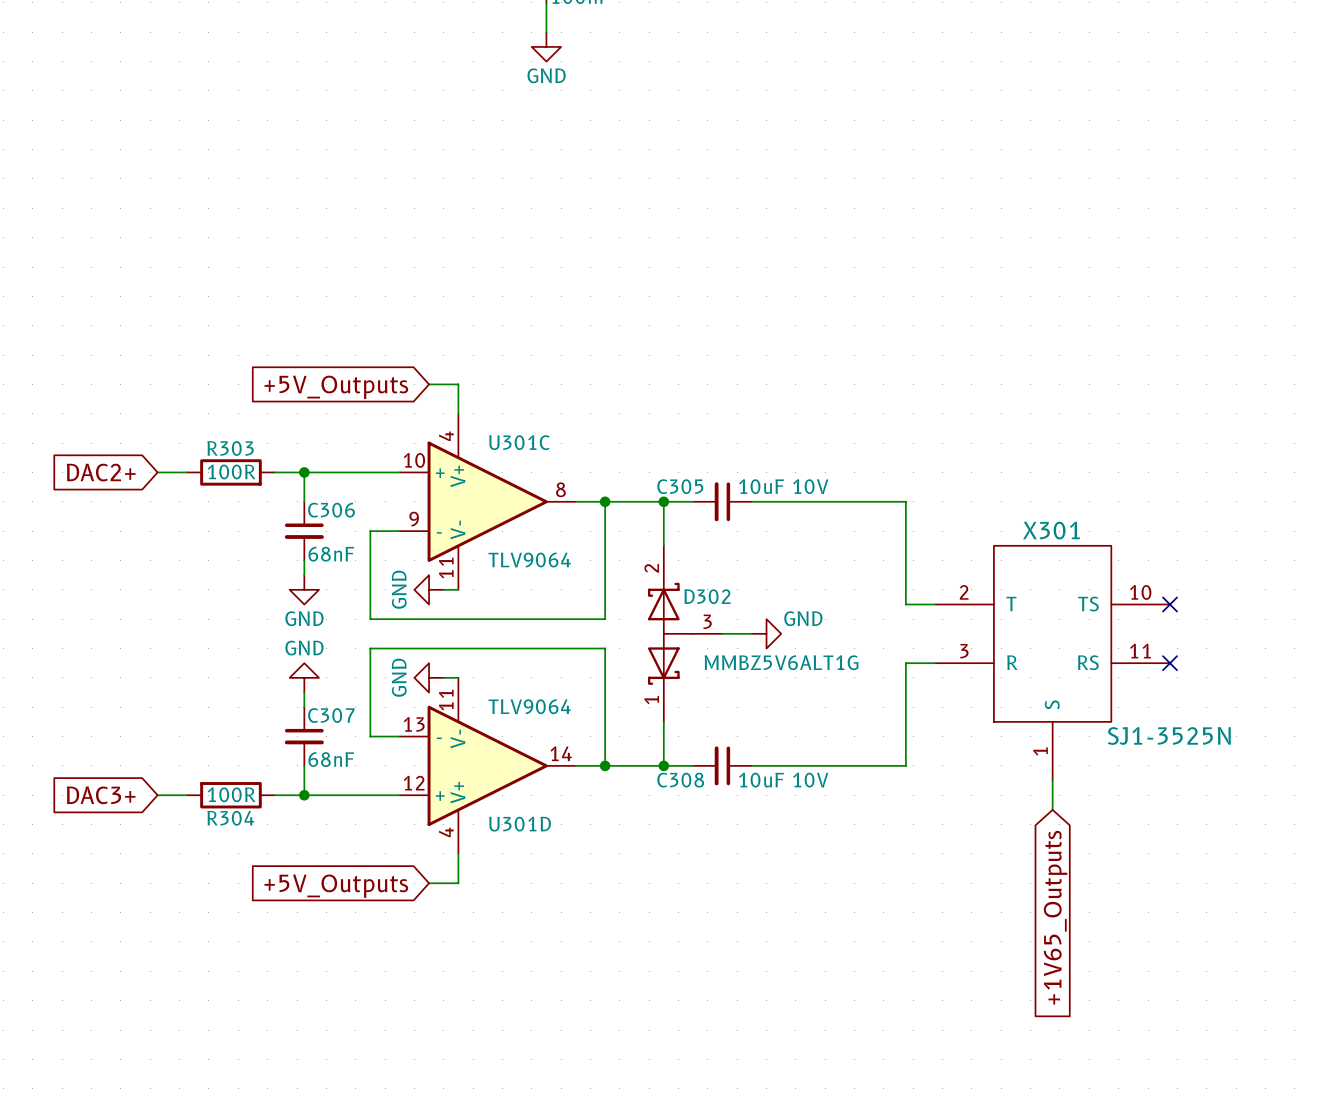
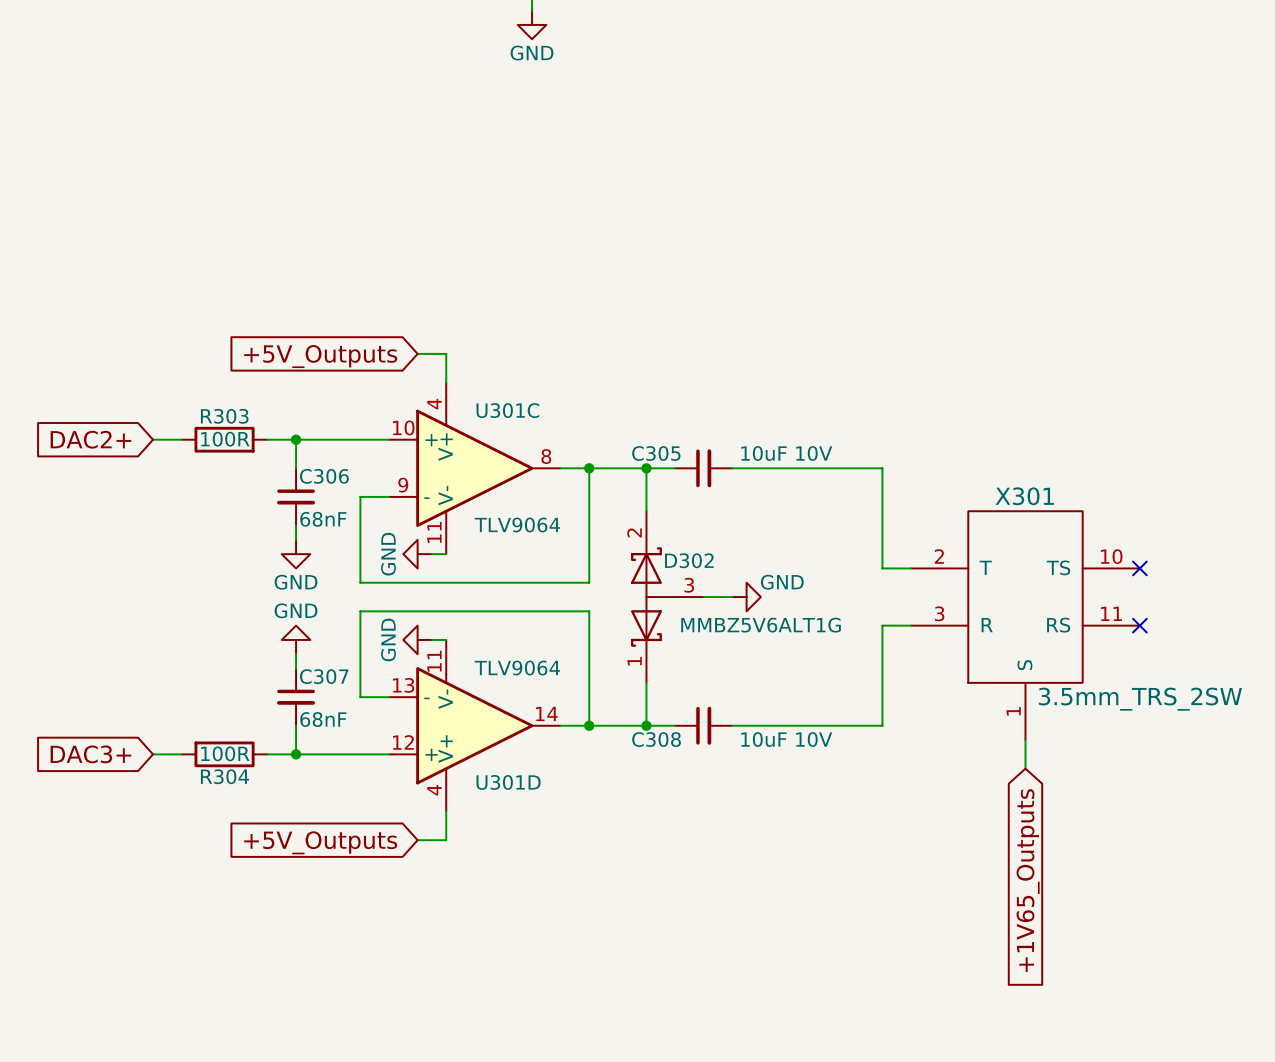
C305 rotation: 0° (722, 501) -> 180° (703, 468)
X301 value: SJ1-3525N (1169, 735) -> 3.5mm_TRS_2SW (1140, 699)
C308 rotation: 0° (722, 765) -> 180° (703, 725)

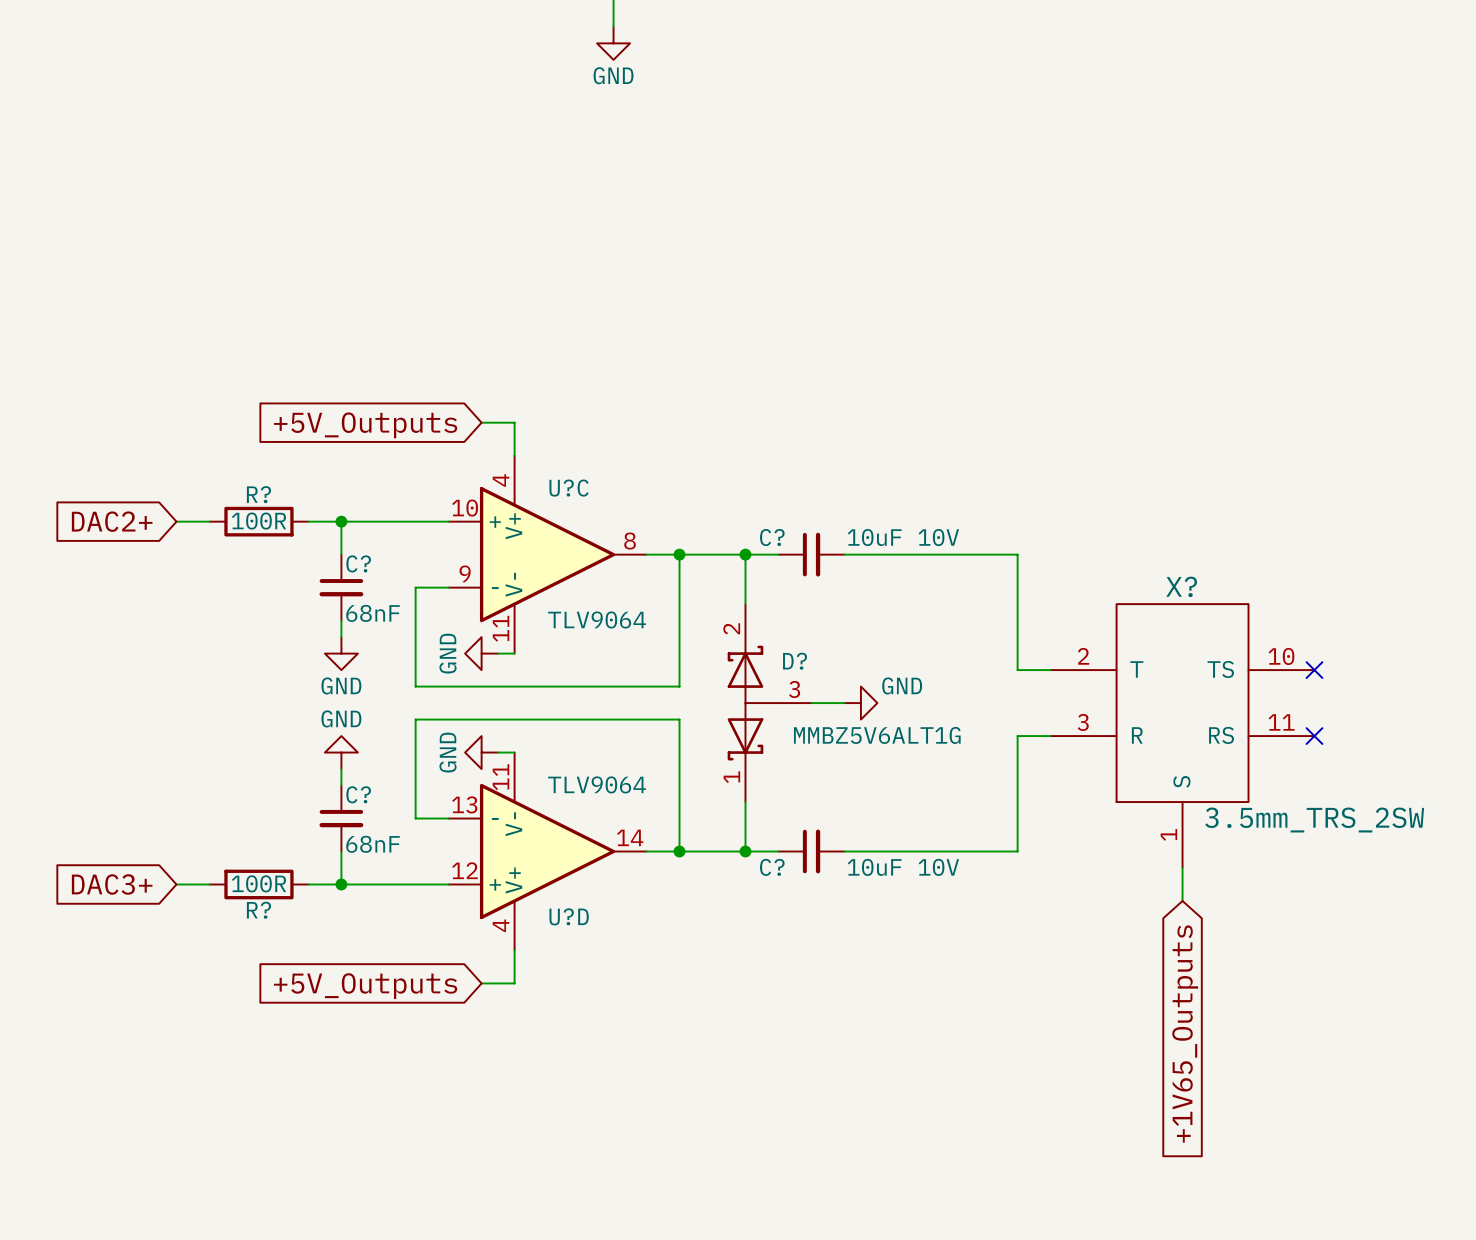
U301C name: U301C (507, 410) -> U?C (569, 488)
R303 name: R303 (224, 416) -> R? (258, 494)
C305 name: C305 (656, 453) -> C? (772, 537)
C306 name: C306 (324, 476) -> C? (358, 563)
X301 name: X301 (1024, 496) -> X? (1181, 586)
D302 name: D302 (689, 560) -> D? (795, 661)
C307 name: C307 (324, 676) -> C? (358, 794)
C308 name: C308 (656, 739) -> C? (772, 867)
R304 name: R304 (224, 776) -> R? (258, 910)
U301D name: U301D (508, 782) -> U?D (569, 916)

